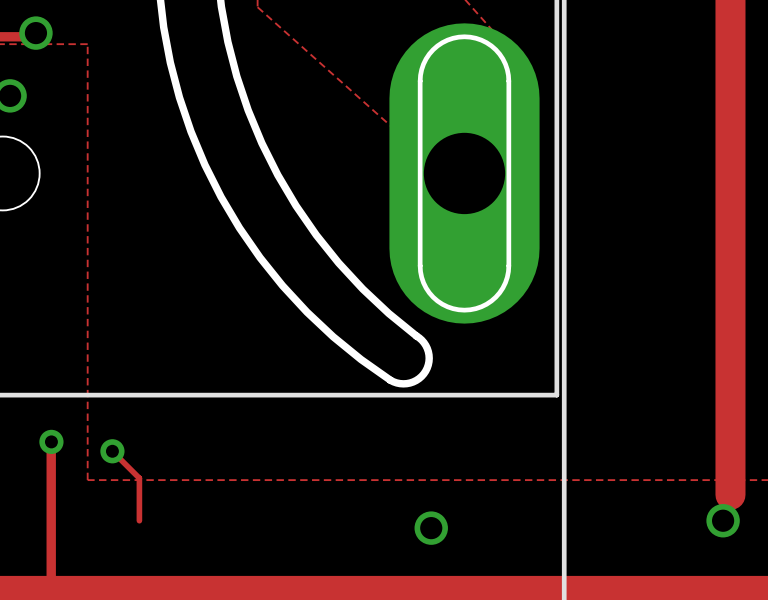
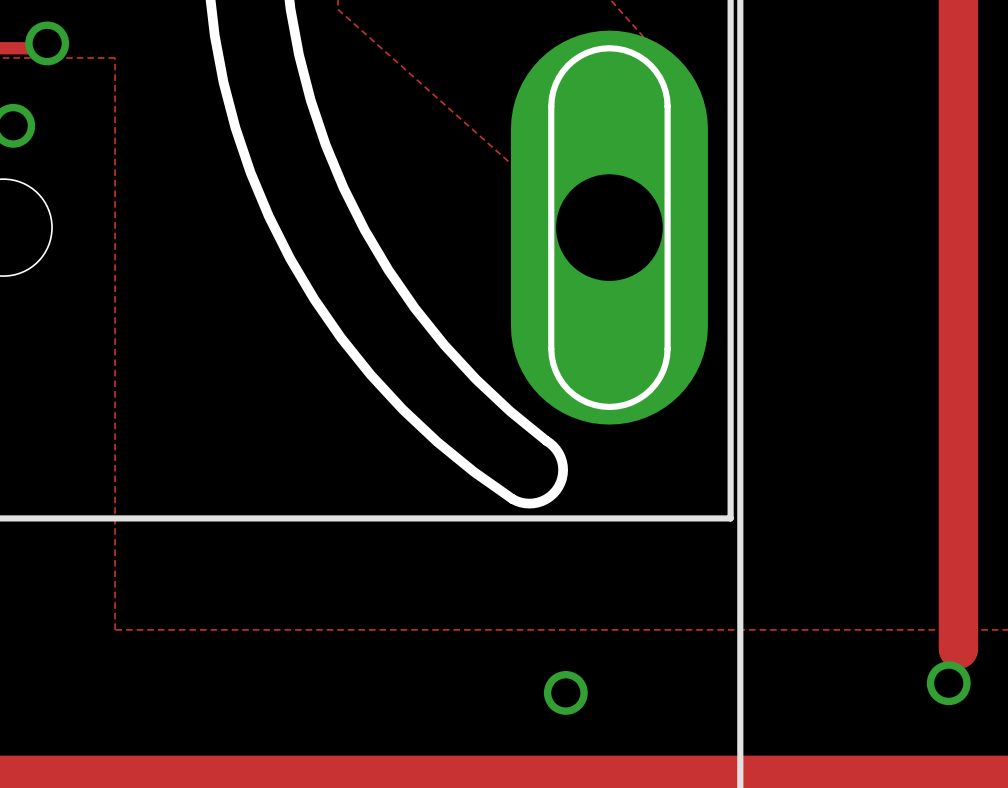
via: (51, 441) -> none
track: (51, 442) (51, 590) -> none
track: (112, 451) (139, 478) (139, 520) -> none
via: (112, 451) -> none

